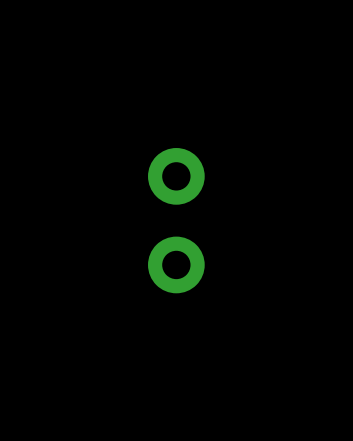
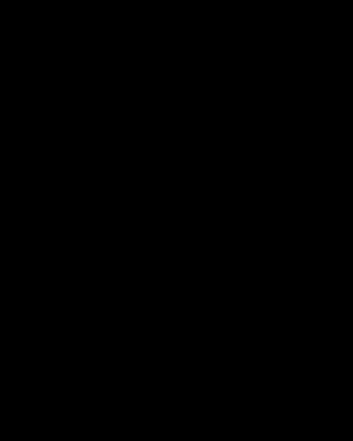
part: (176, 220) -> none

